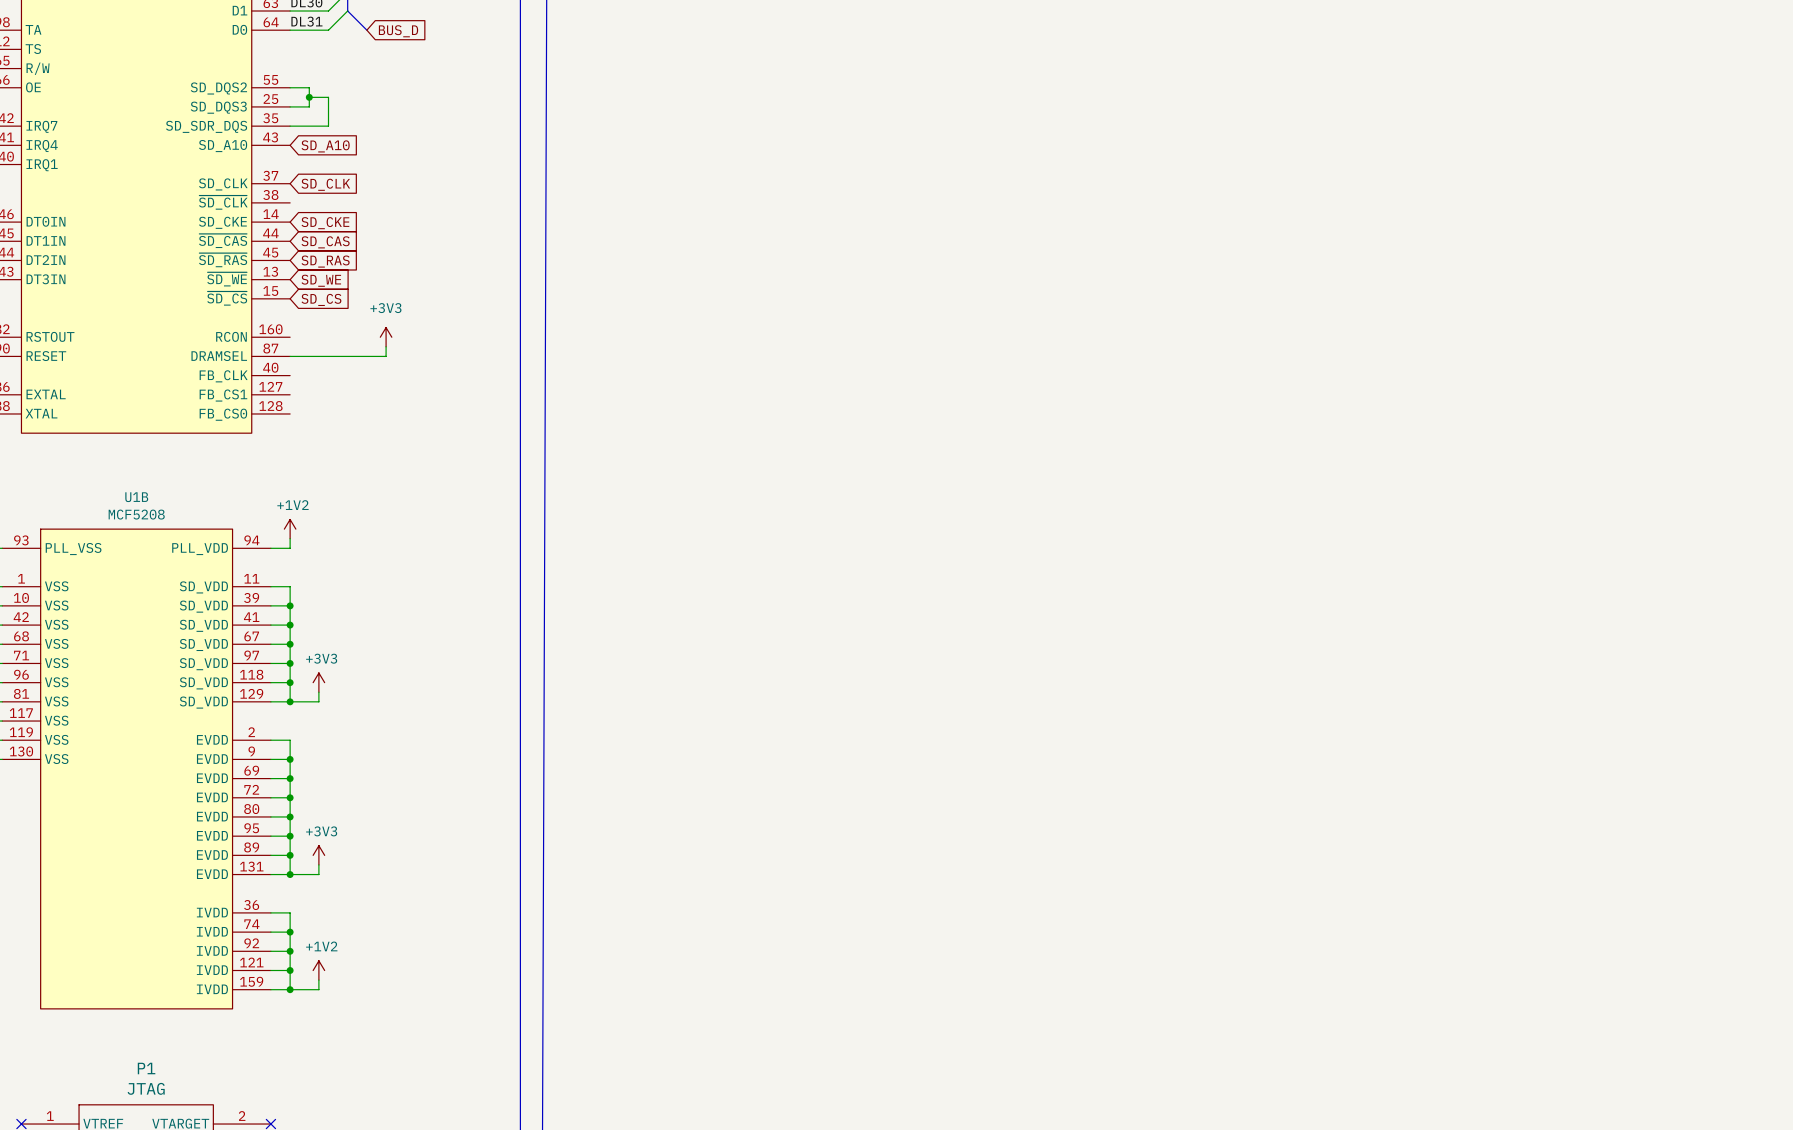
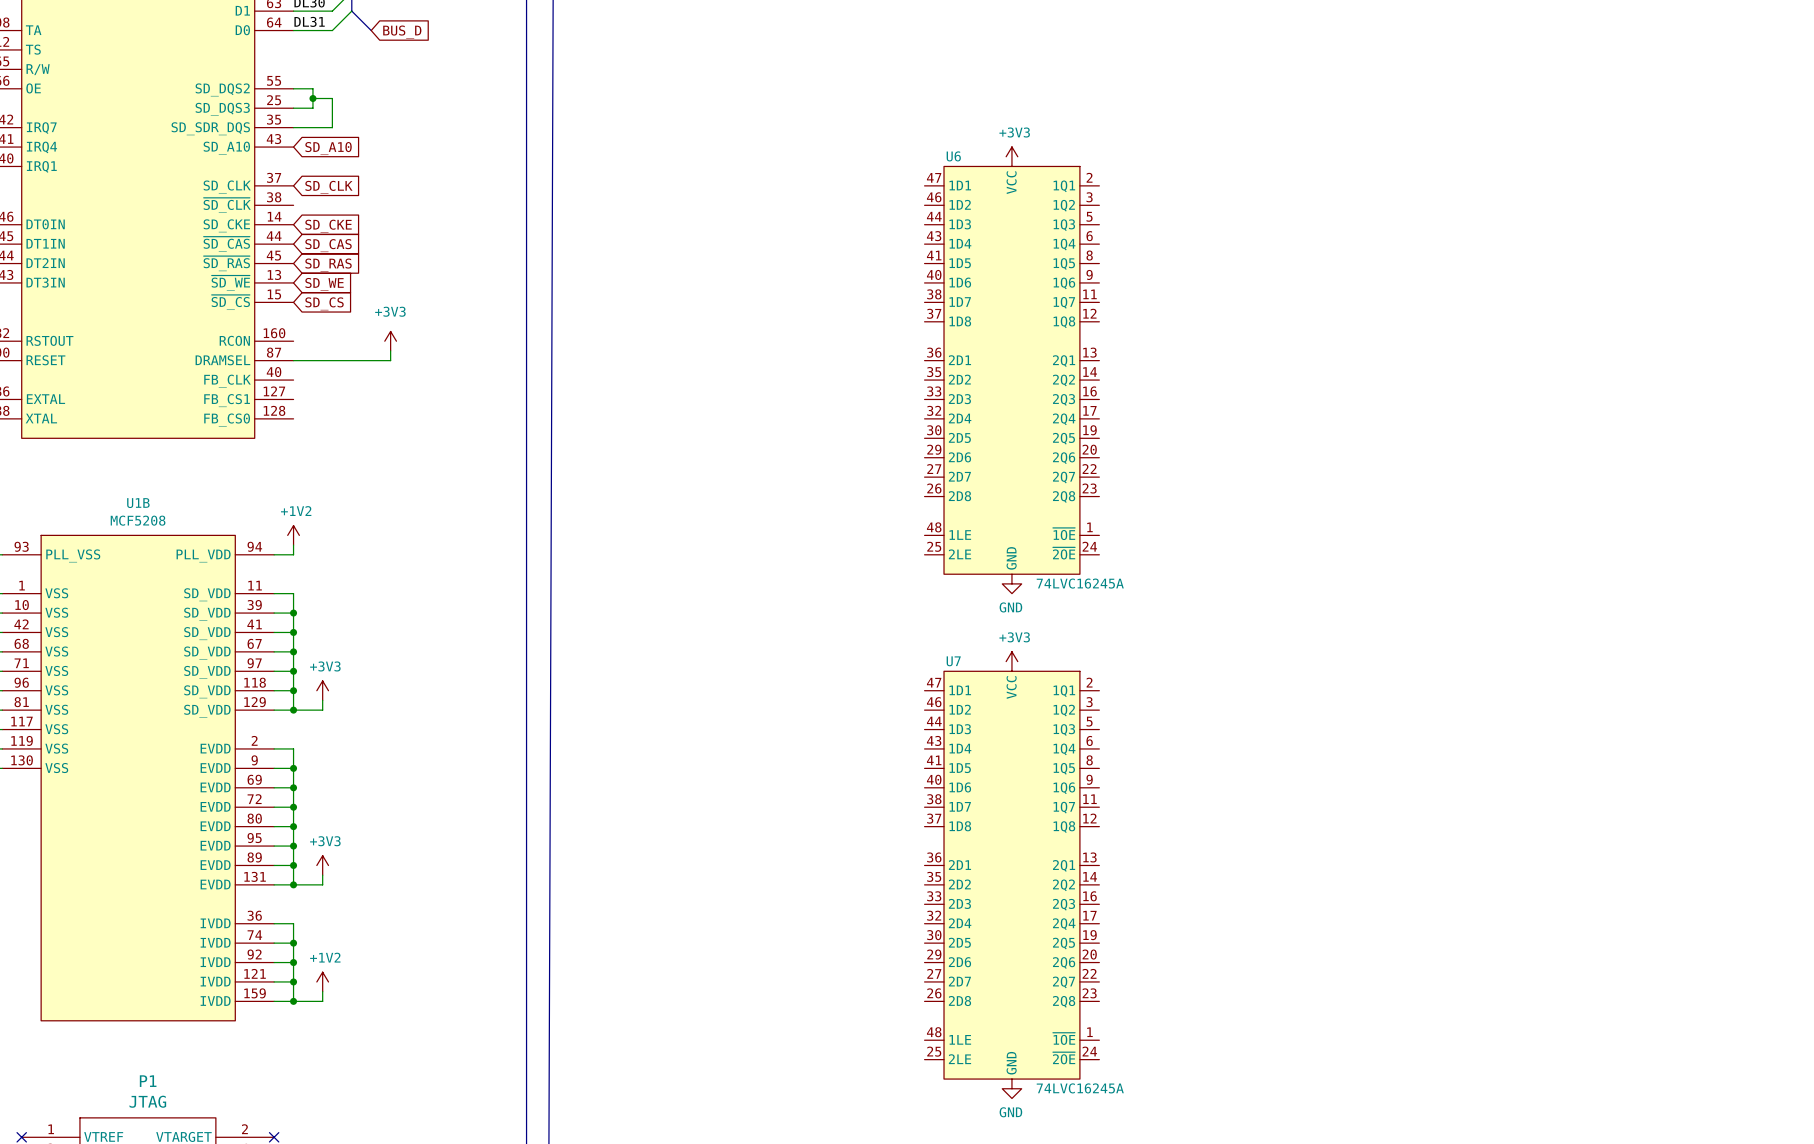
power symbol: none -> +3V3 (1011, 156)
U6: none -> 74LVC16245A (1011, 370)
power symbol: none -> GND (1011, 583)
power symbol: none -> +3V3 (1011, 661)
U7: none -> 74LVC16245A (1011, 875)
power symbol: none -> GND (1011, 1088)

